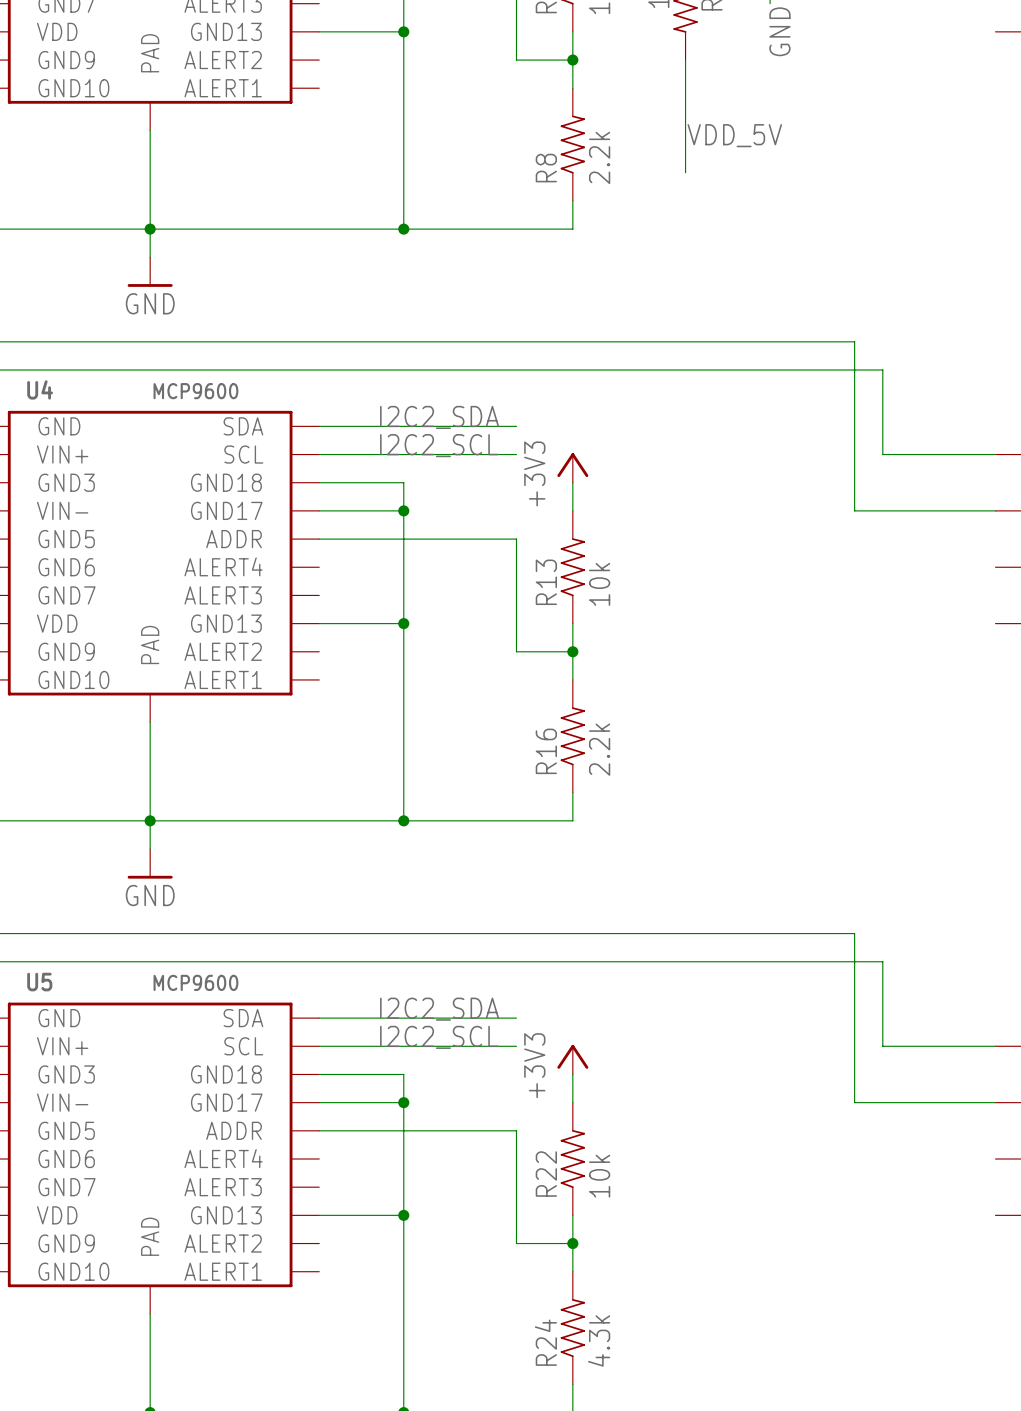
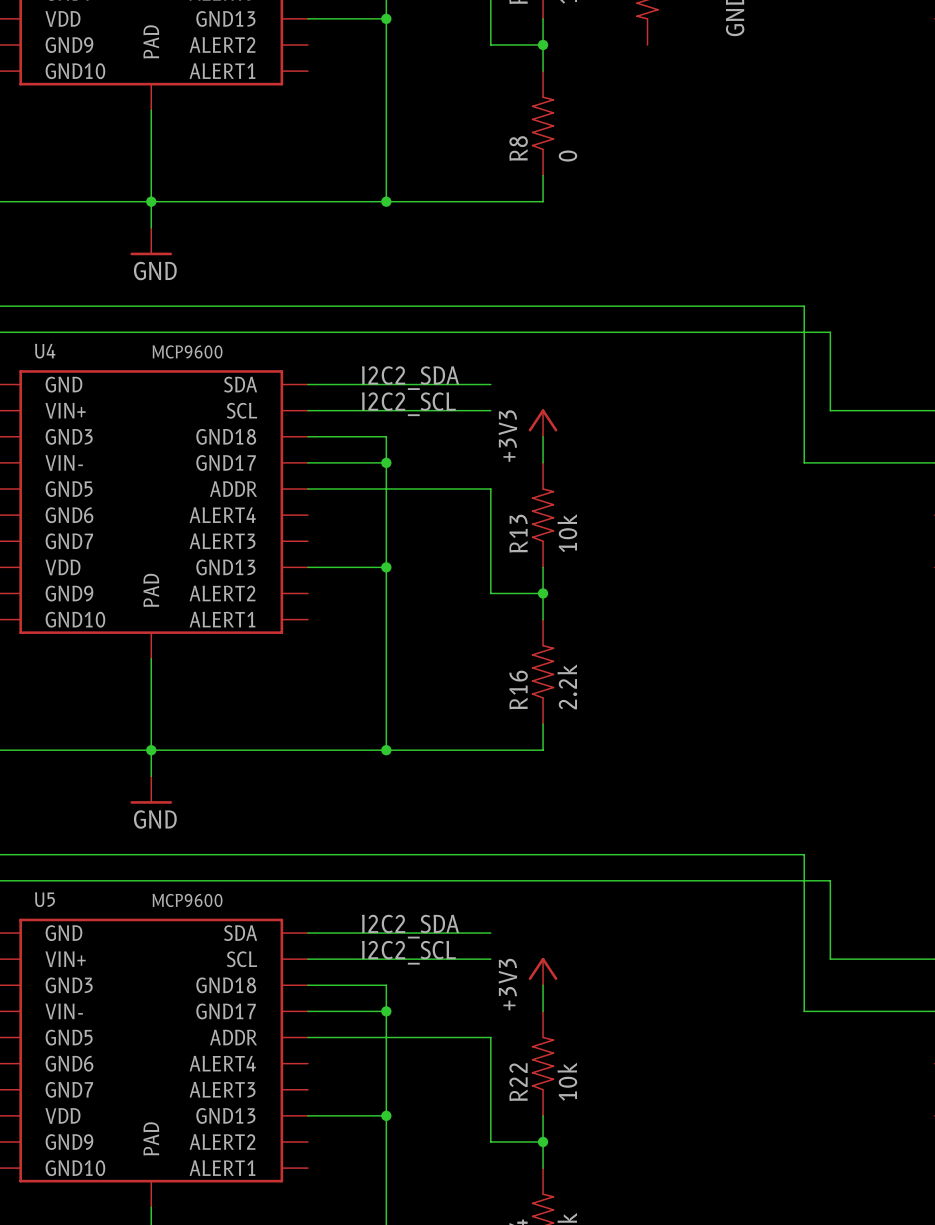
wire: (685, 60) (685, 172) -> none
label: VDD_5V (734, 135) -> none
R8 value: 2.2k (599, 157) -> 0 (567, 156)

